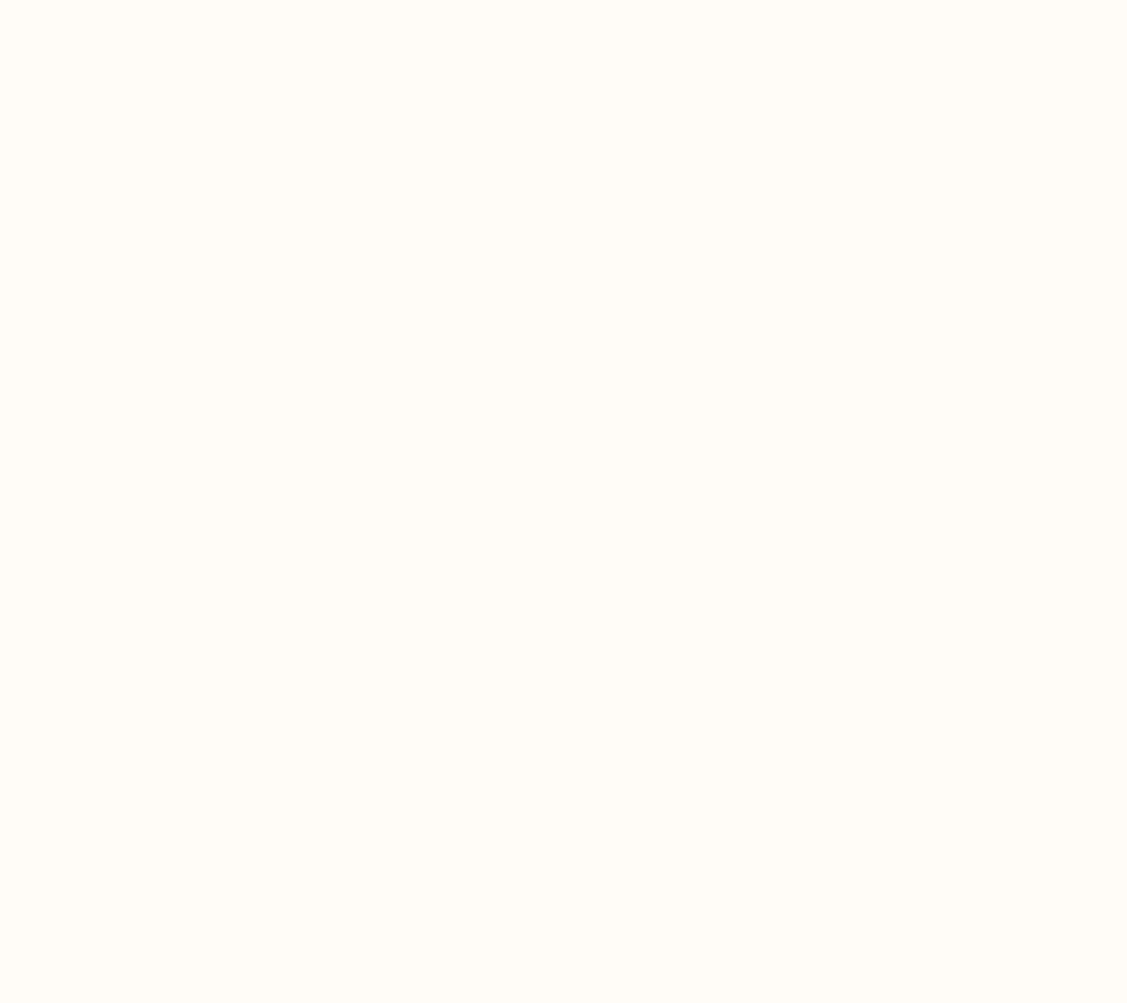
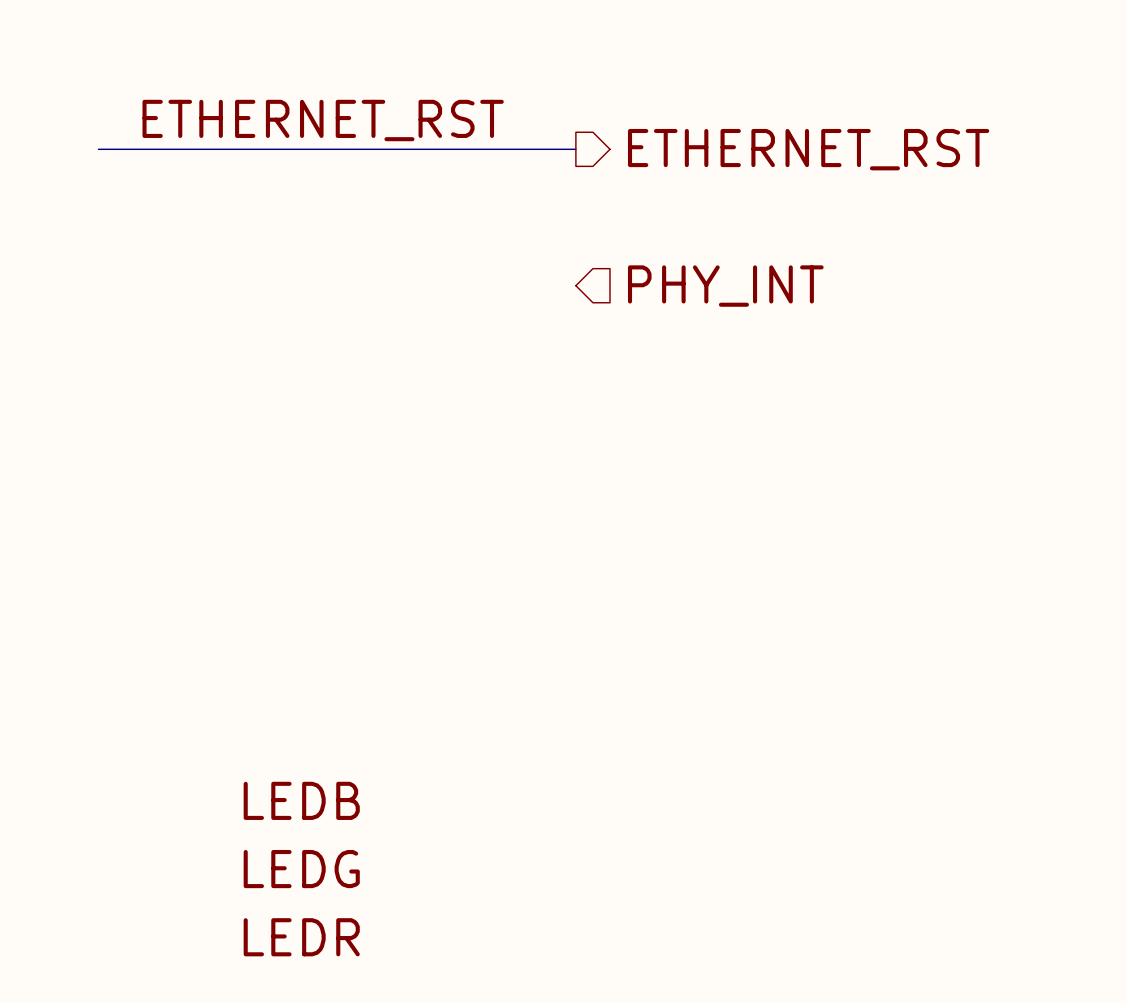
label: none -> ETHERNET_RST (323, 120)
wire: none -> (98, 149) (575, 149)
hierarchical label: none -> ETHERNET_RST (808, 149)
hierarchical label: none -> PHY_INT (725, 286)
label: none -> LEDB (301, 800)
label: none -> LEDG (301, 869)
label: none -> LEDR (301, 937)

